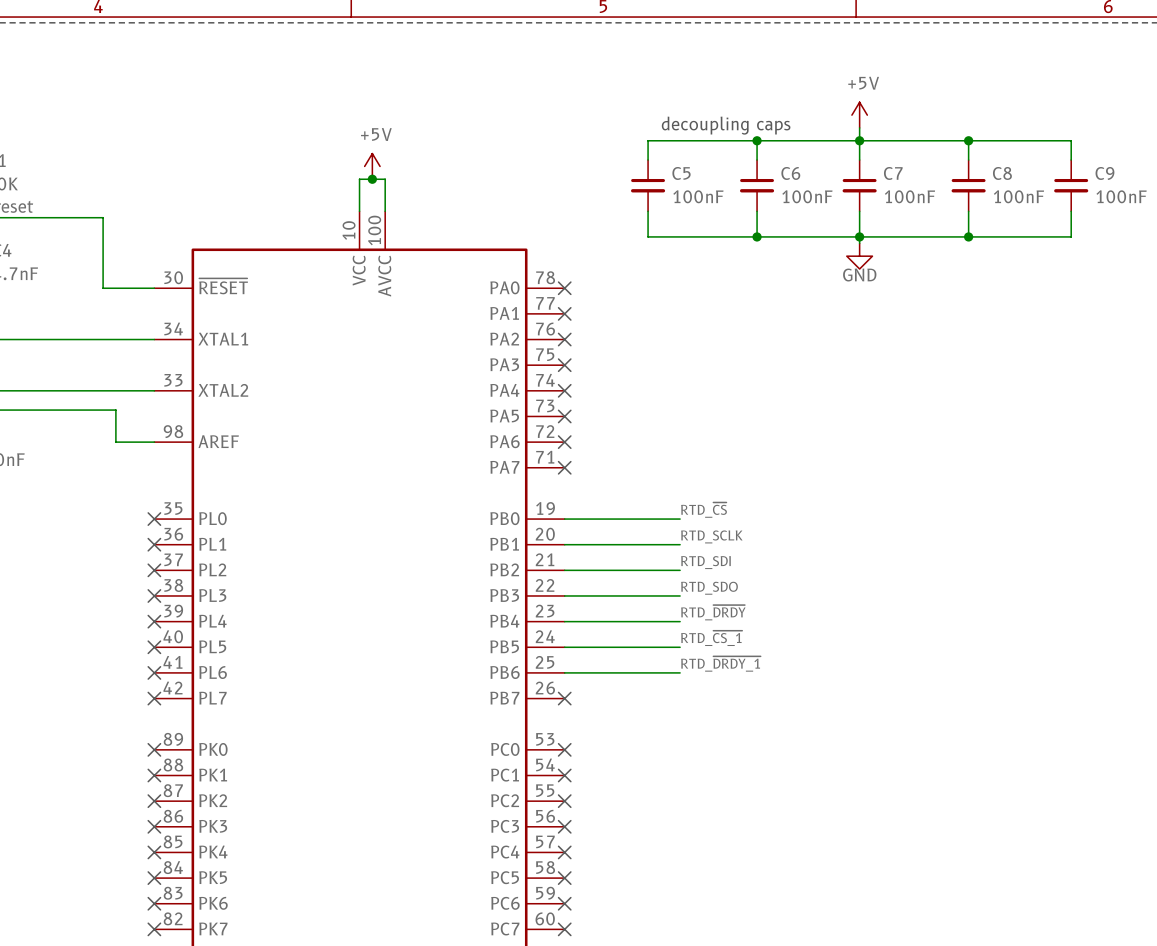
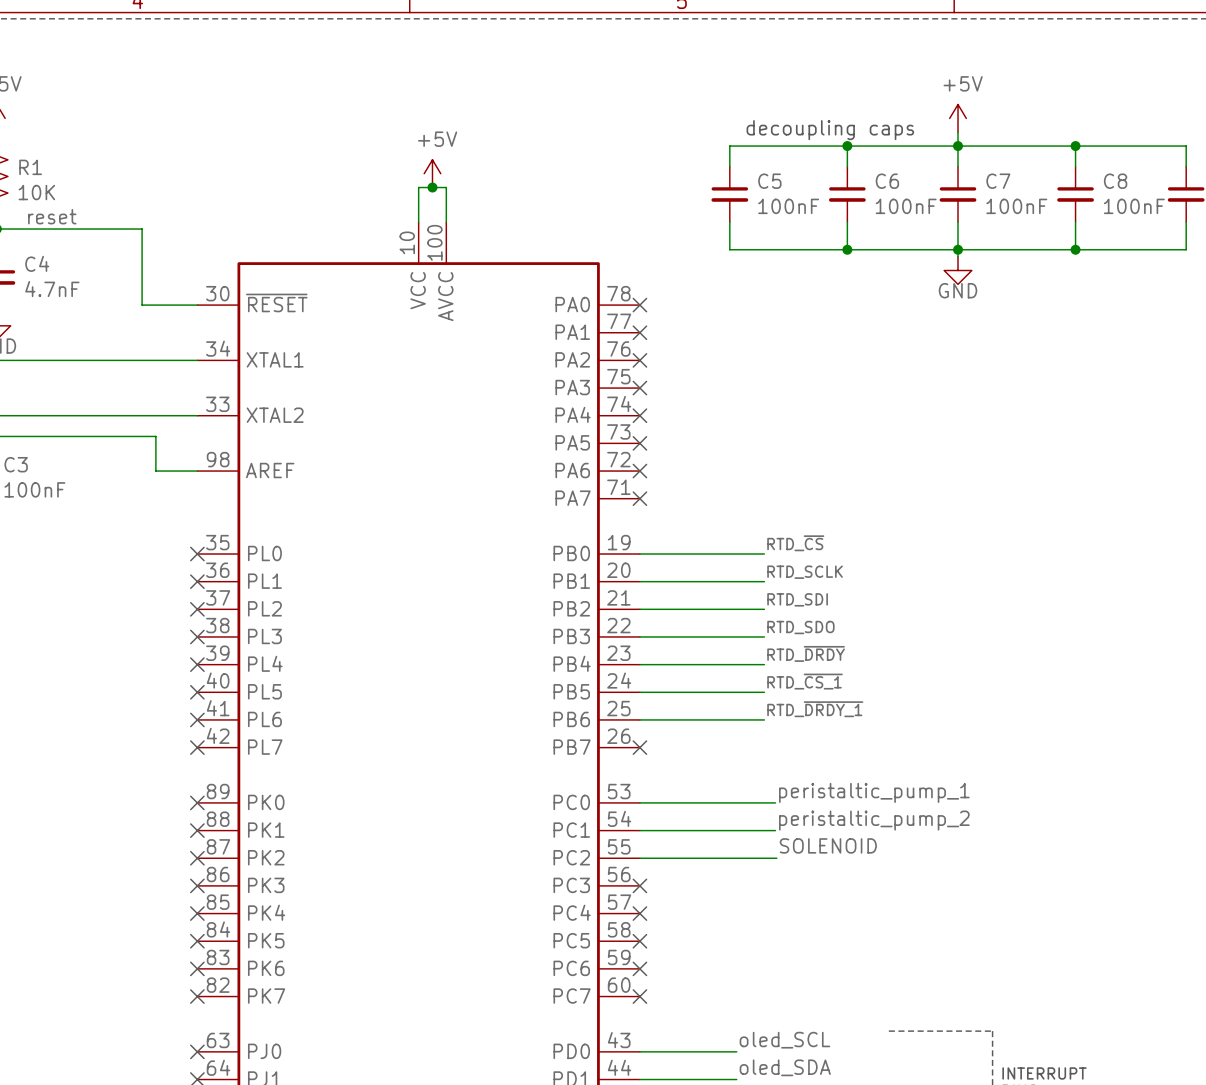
label: none -> peristaltic_pump_1 (874, 792)
wire: none -> (639, 802) (775, 802)
no-connect mark: (564, 749) -> none
label: none -> peristaltic_pump_2 (874, 820)
wire: none -> (639, 830) (775, 830)
no-connect mark: (564, 775) -> none
label: none -> SOLENOID (828, 845)
wire: none -> (639, 858) (776, 858)
no-connect mark: (564, 801) -> none

